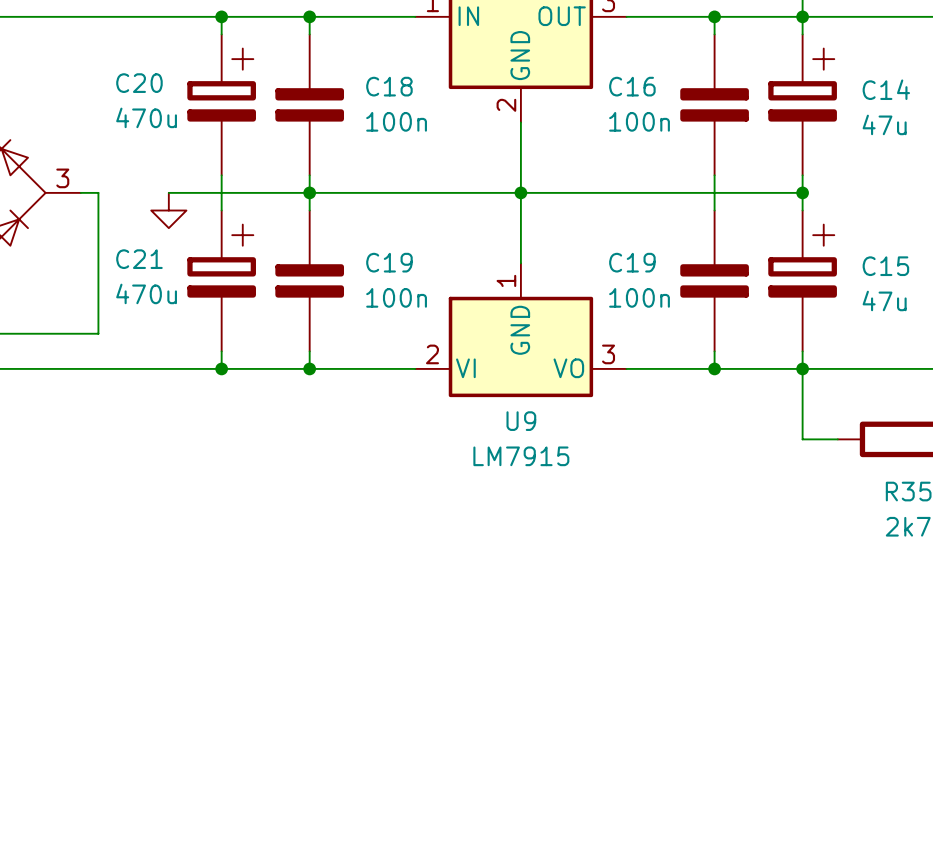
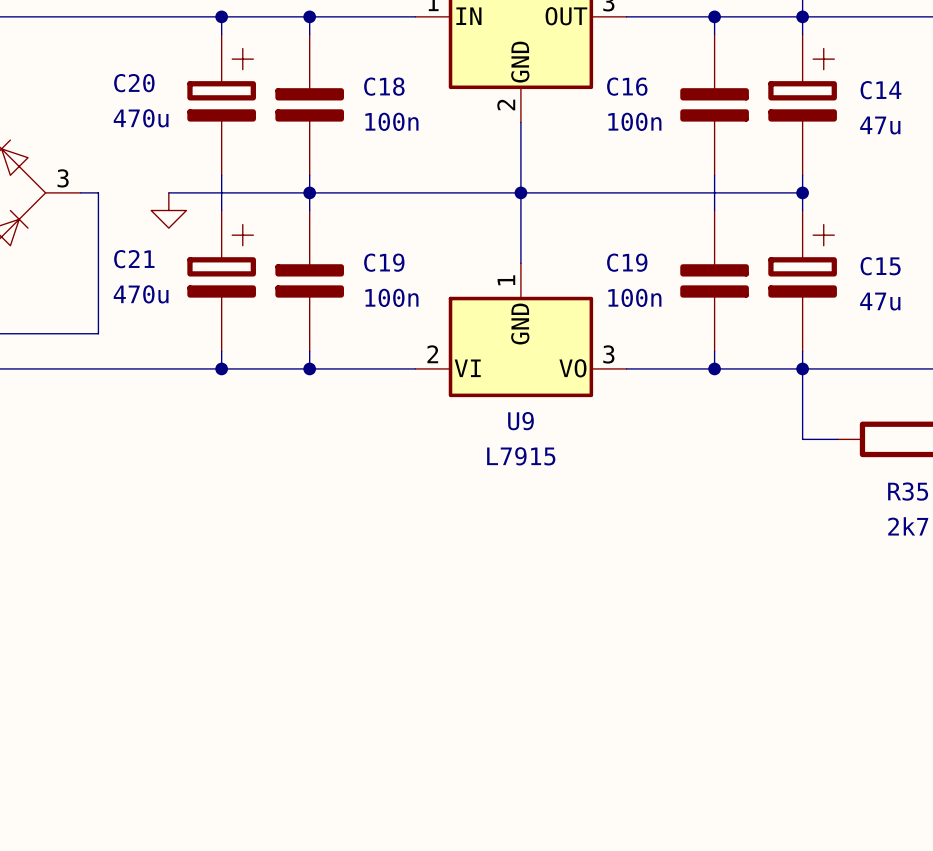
U9 value: LM7915 (521, 456) -> L7915 (521, 456)

